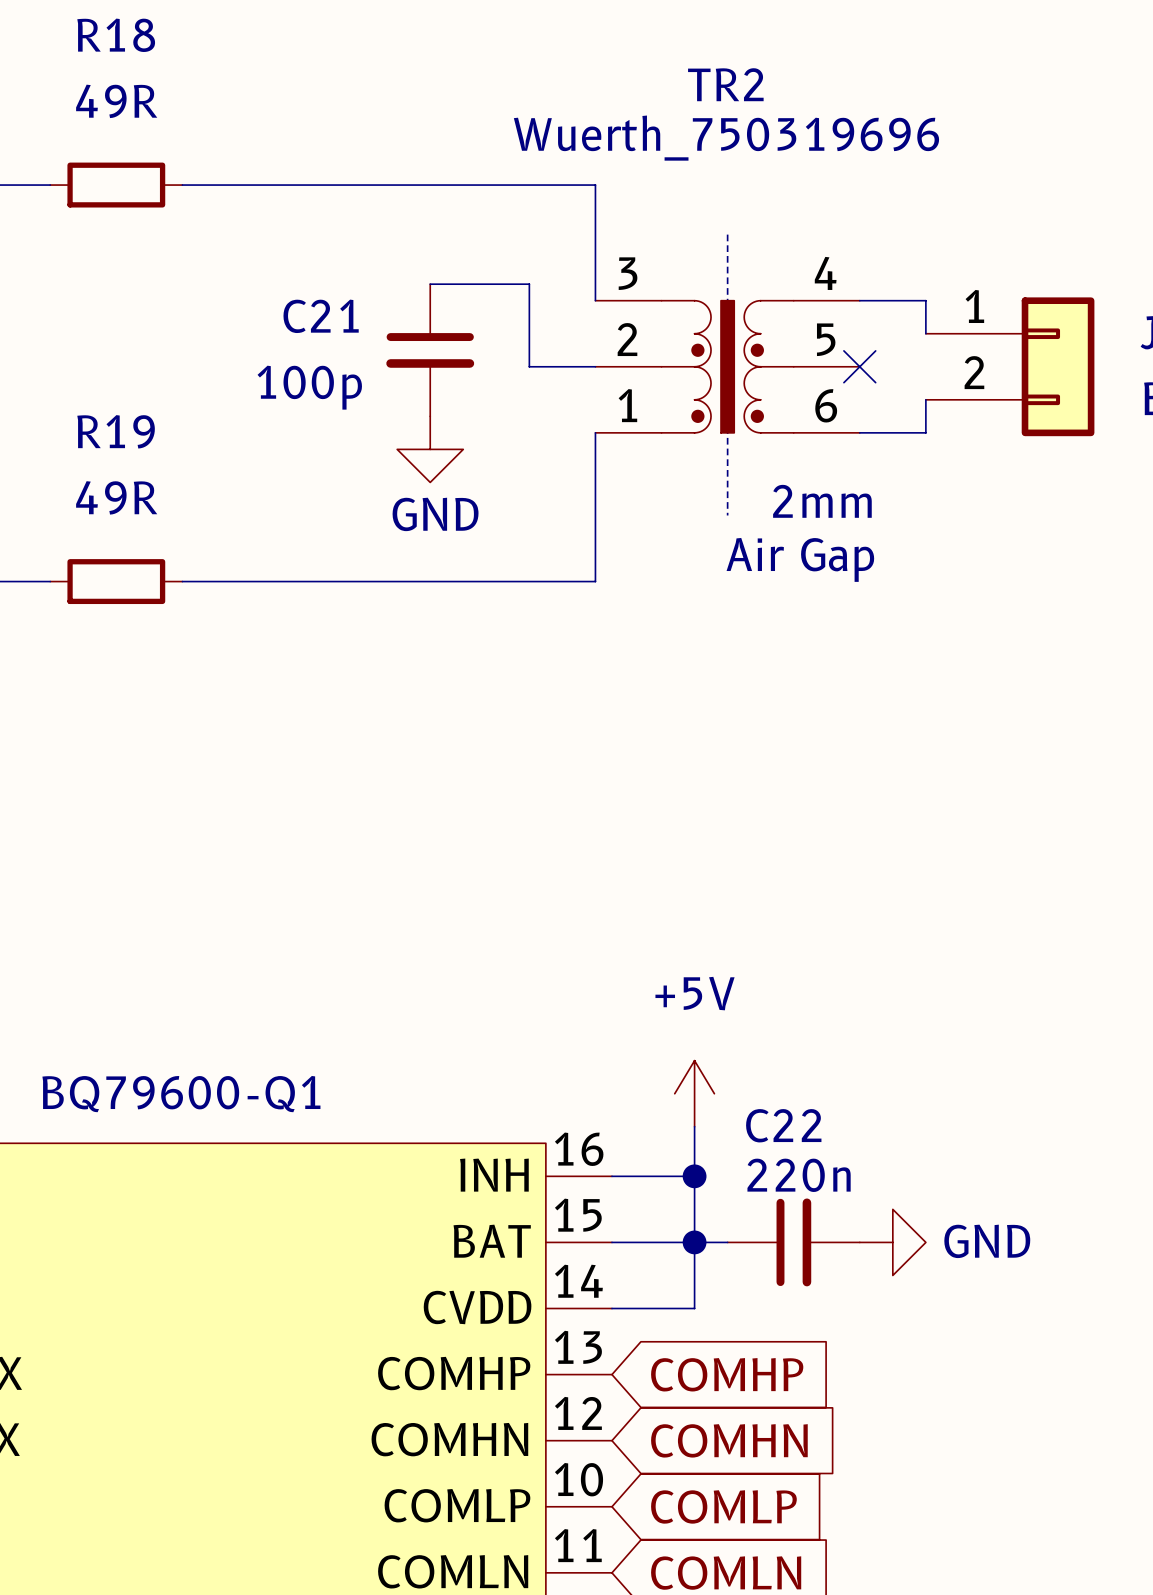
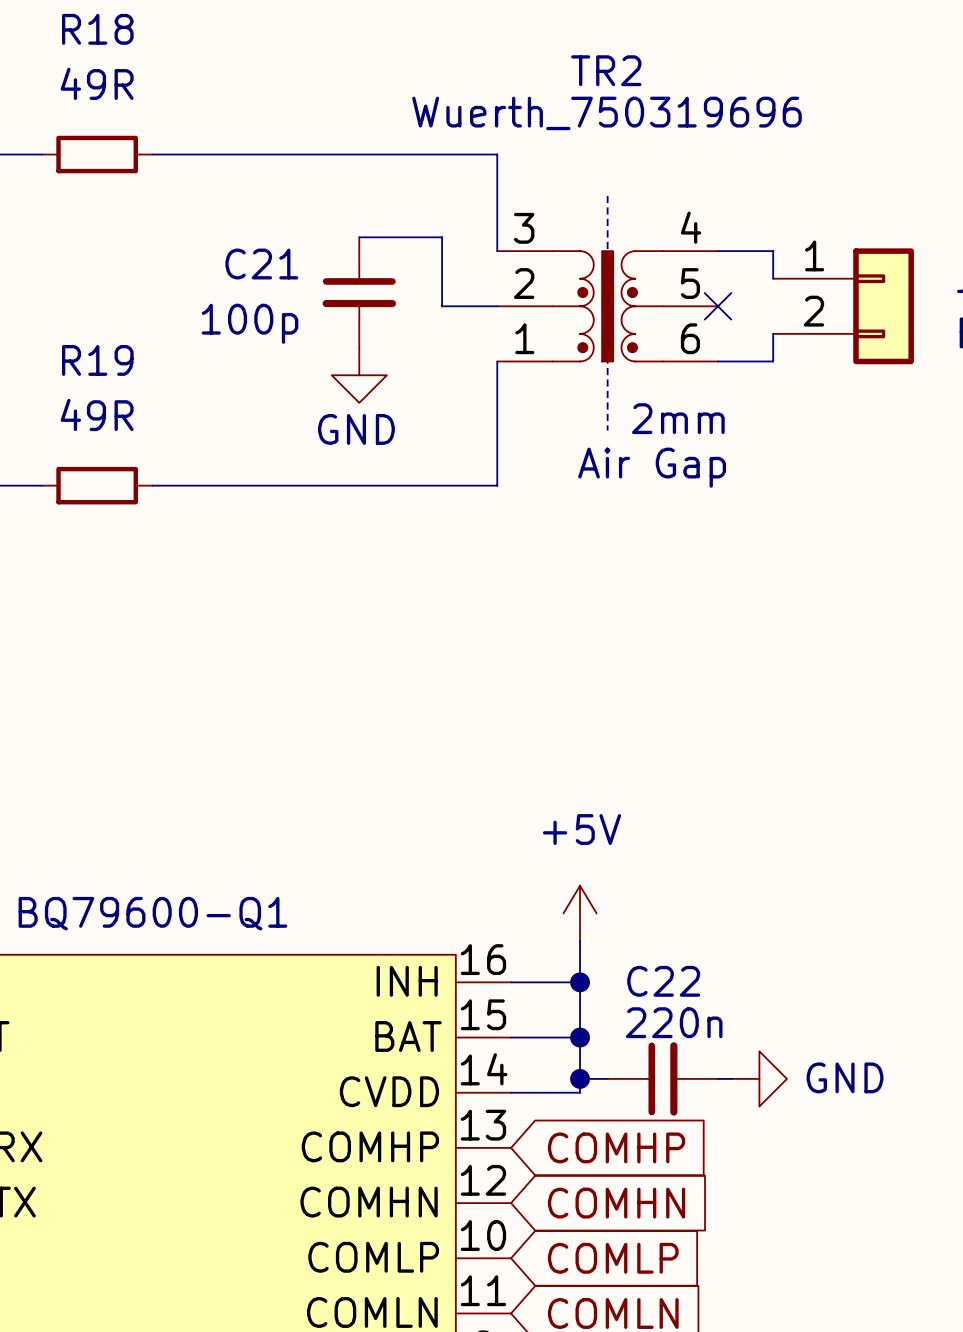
wire: (694, 1242) (727, 1242) -> (580, 1078) (607, 1078)
C22 position: (793, 1242) -> (662, 1078)
power symbol position: GND (892, 1242) -> GND (759, 1078)
junction: none -> (580, 1078)
wire: none -> (718, 1078) (731, 1078)

